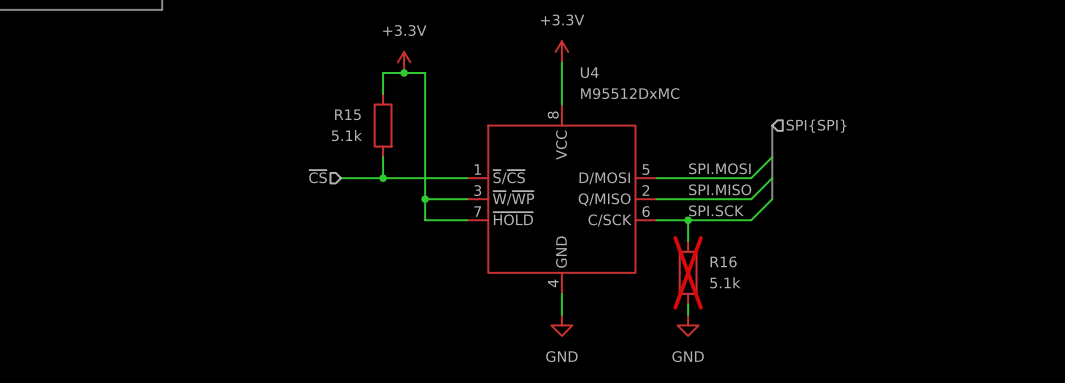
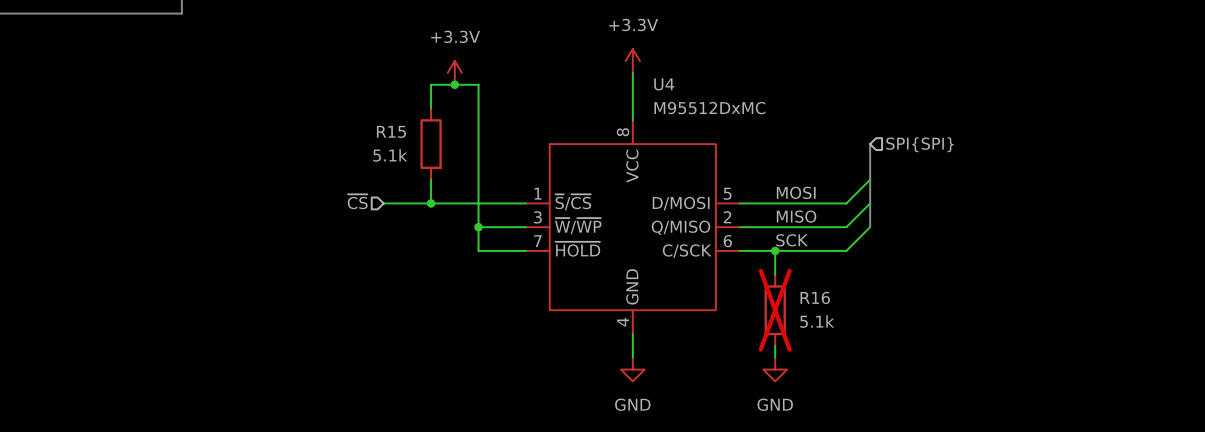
label: SPI.MOSI (719, 168) -> MOSI (796, 192)
label: SPI.MISO (720, 189) -> MISO (796, 216)
label: SPI.SCK (716, 210) -> SCK (792, 240)

